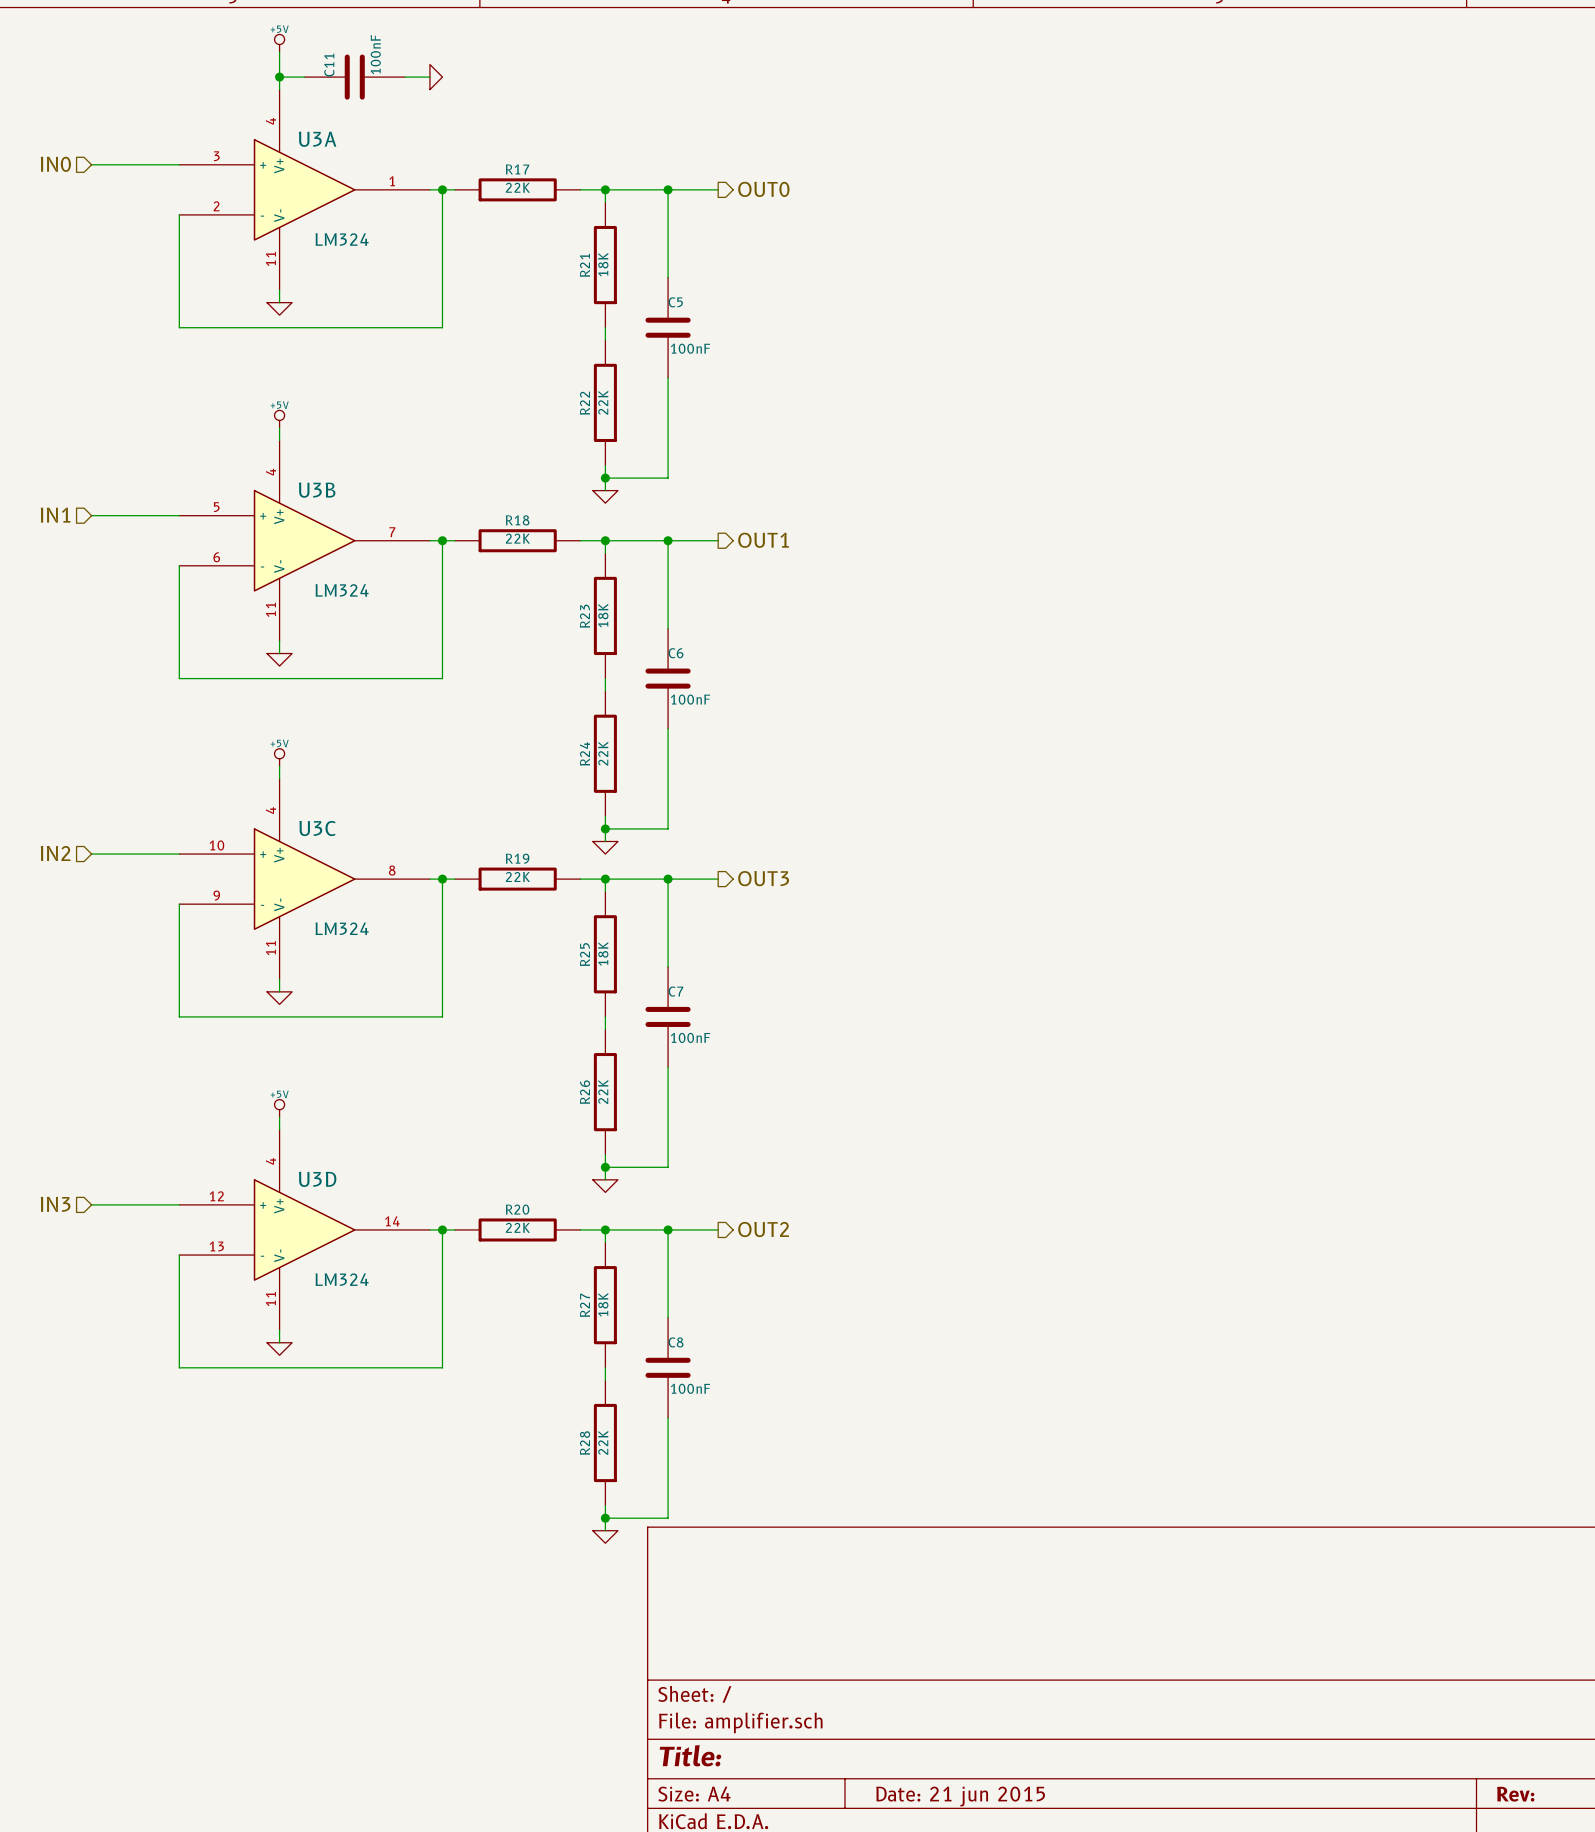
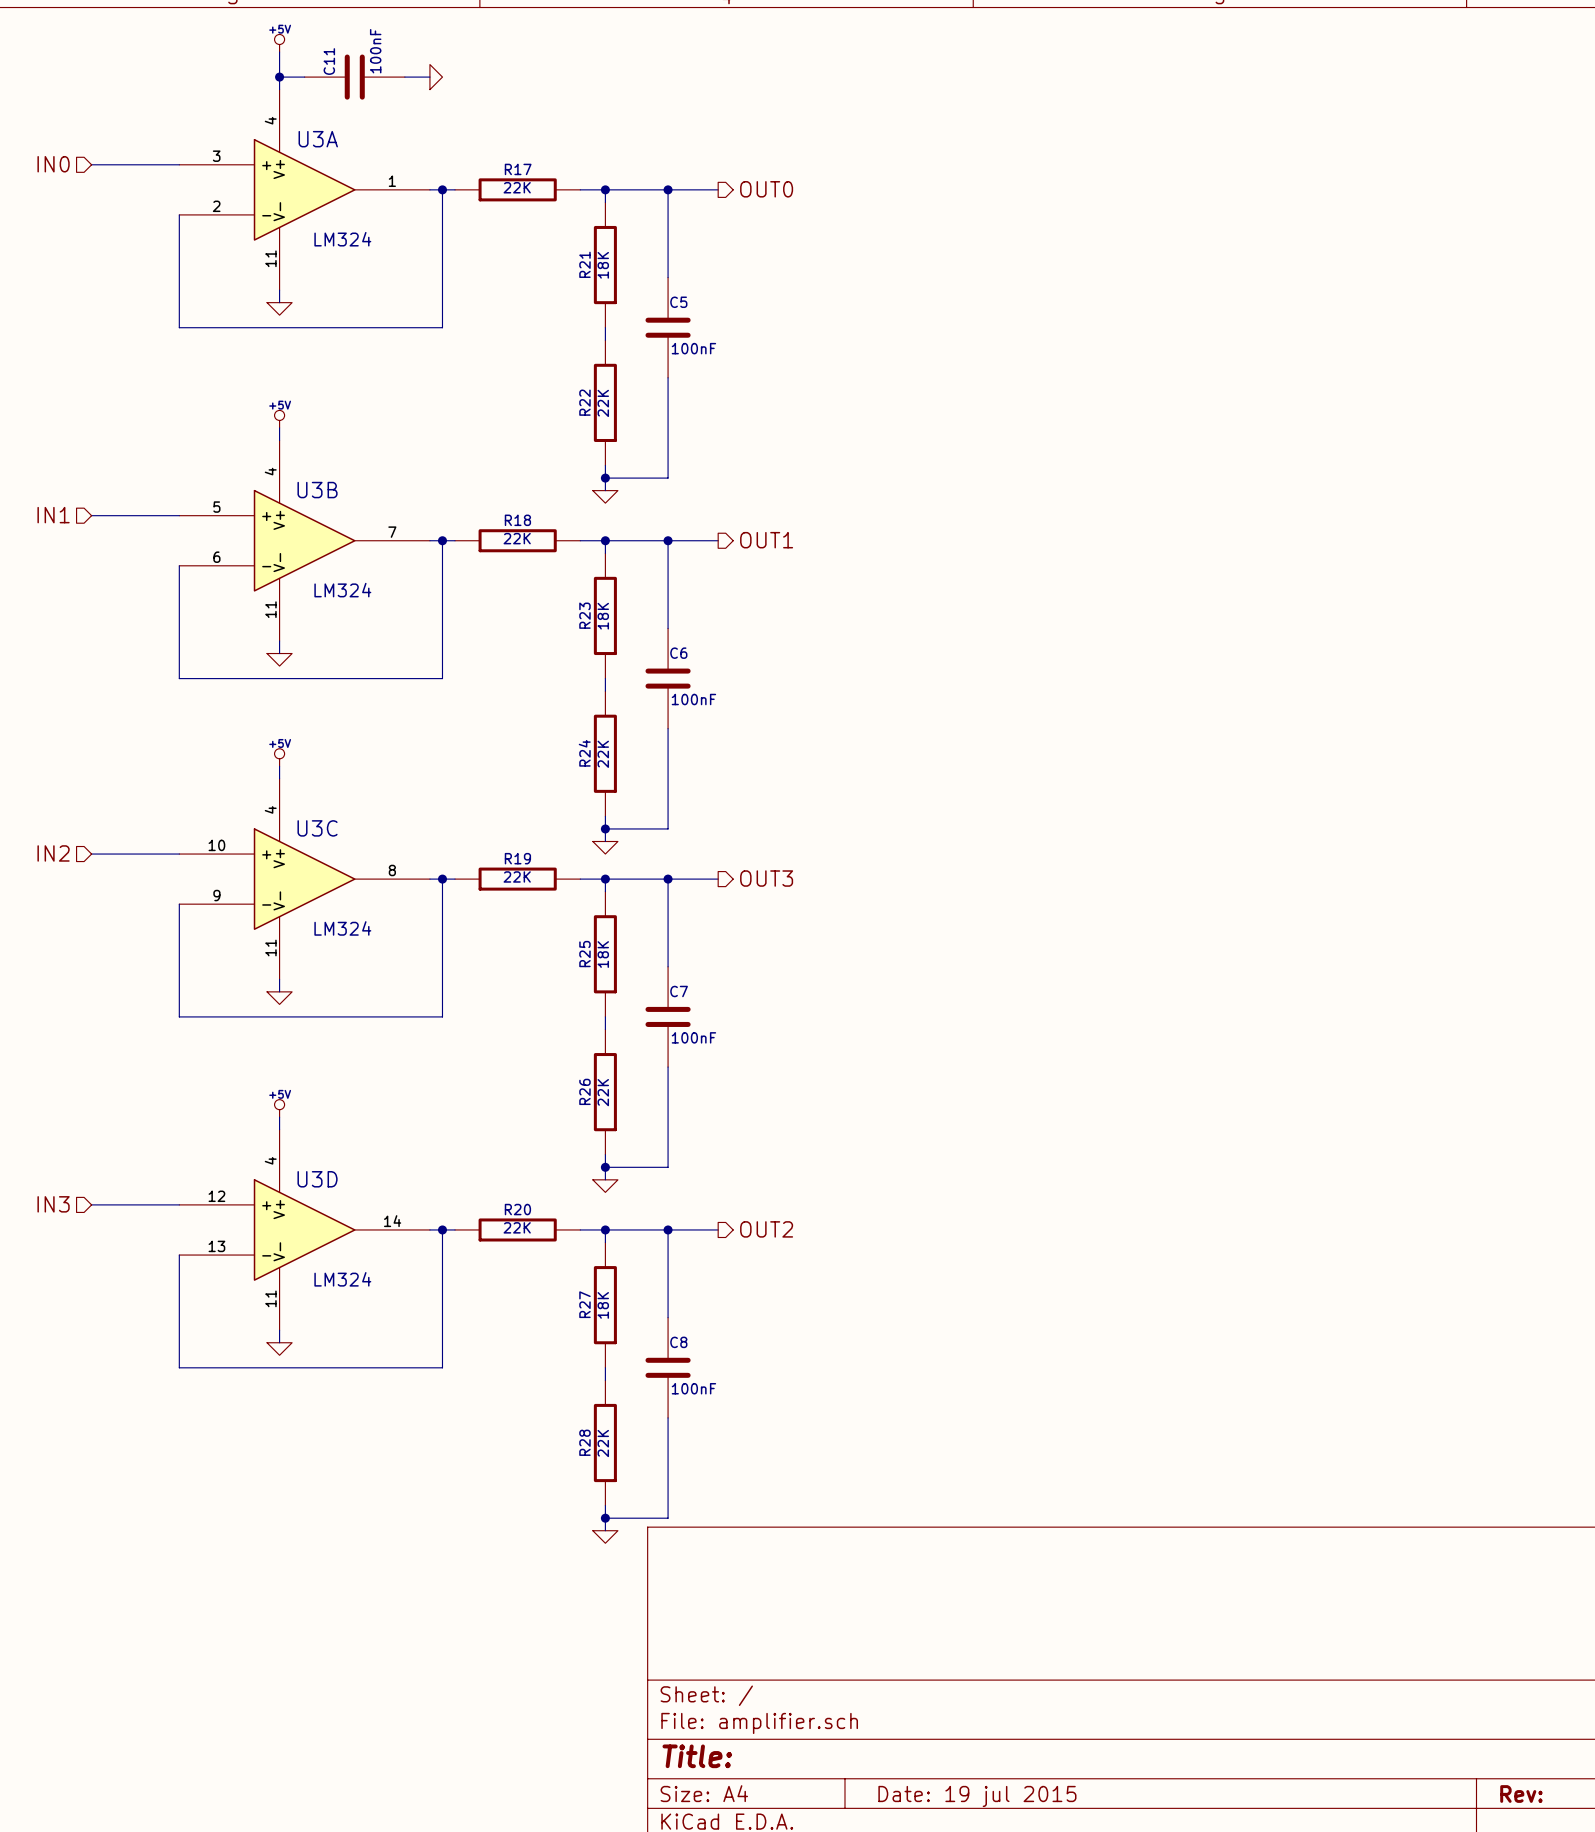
title block: Date: 21 jun 2015 (960, 1796) -> Date: 19 jul 2015 (977, 1796)

